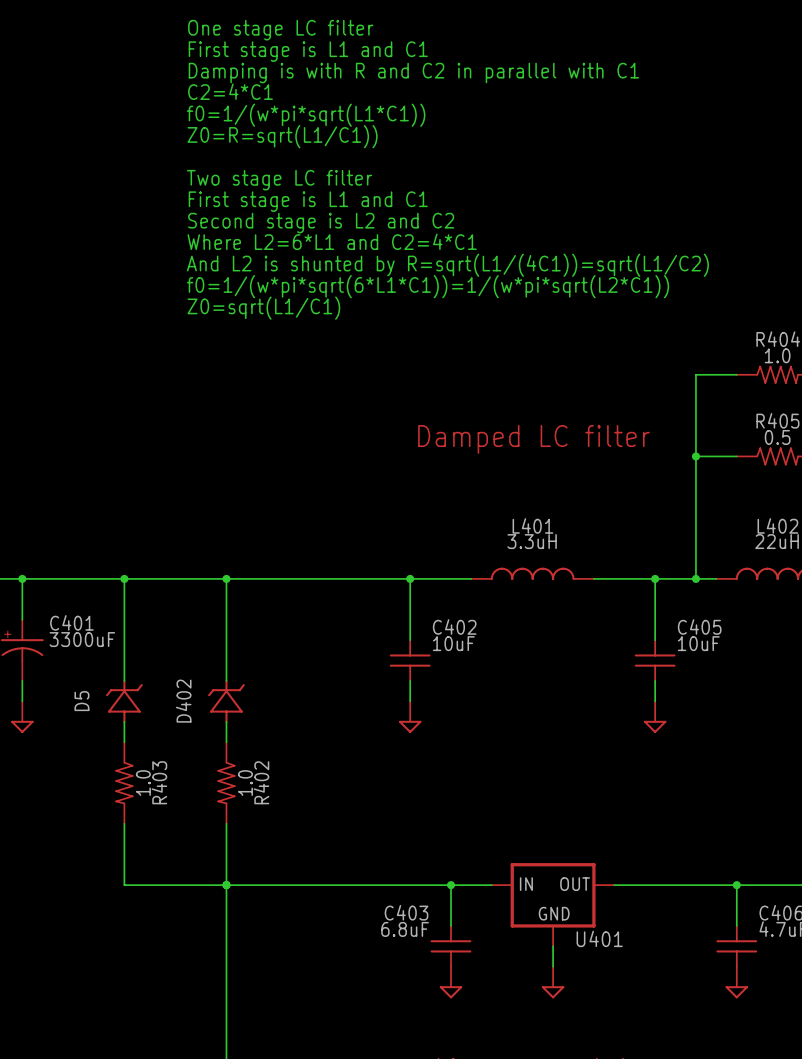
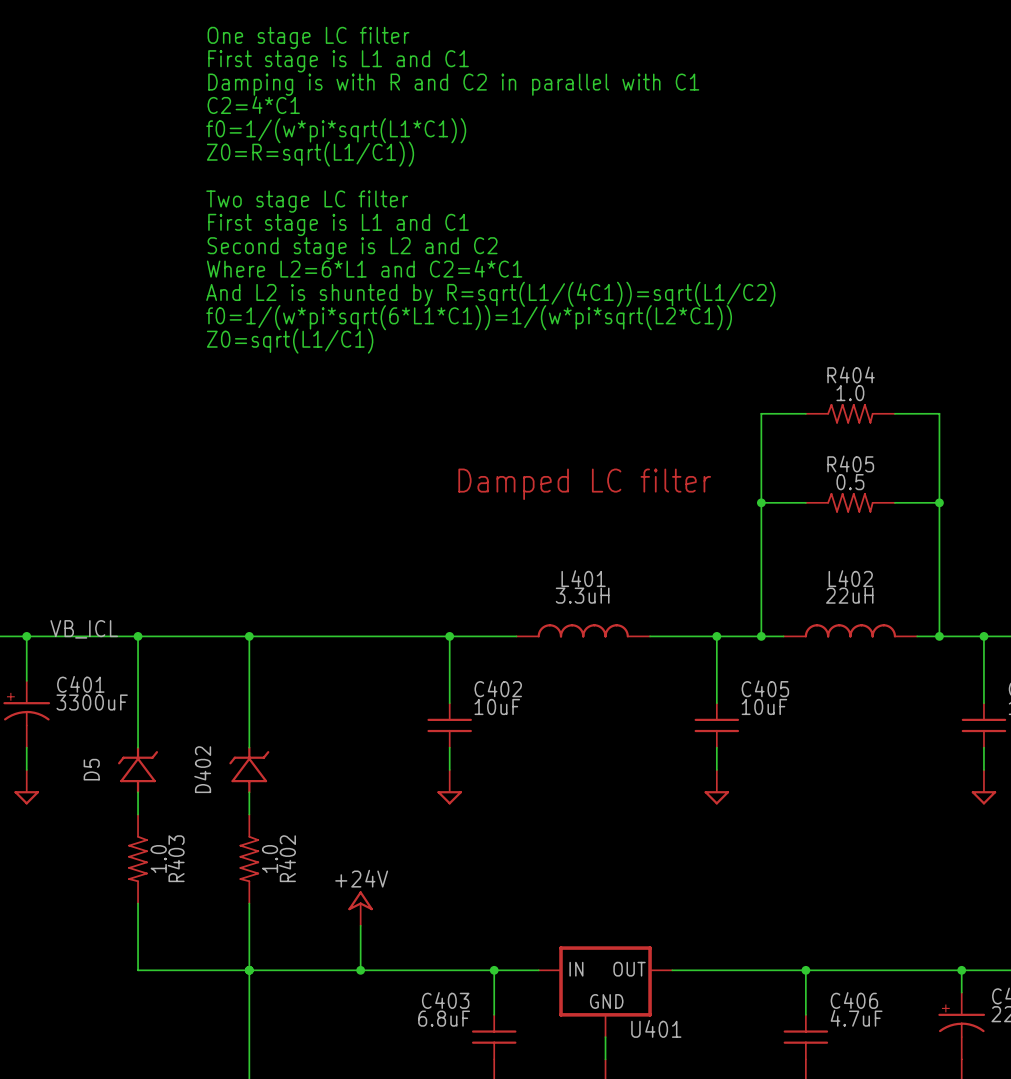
label: none -> VB_ICL (84, 629)
power symbol: none -> +24V (360, 908)
wire: none -> (360, 925) (360, 970)
junction: none -> (360, 970)

